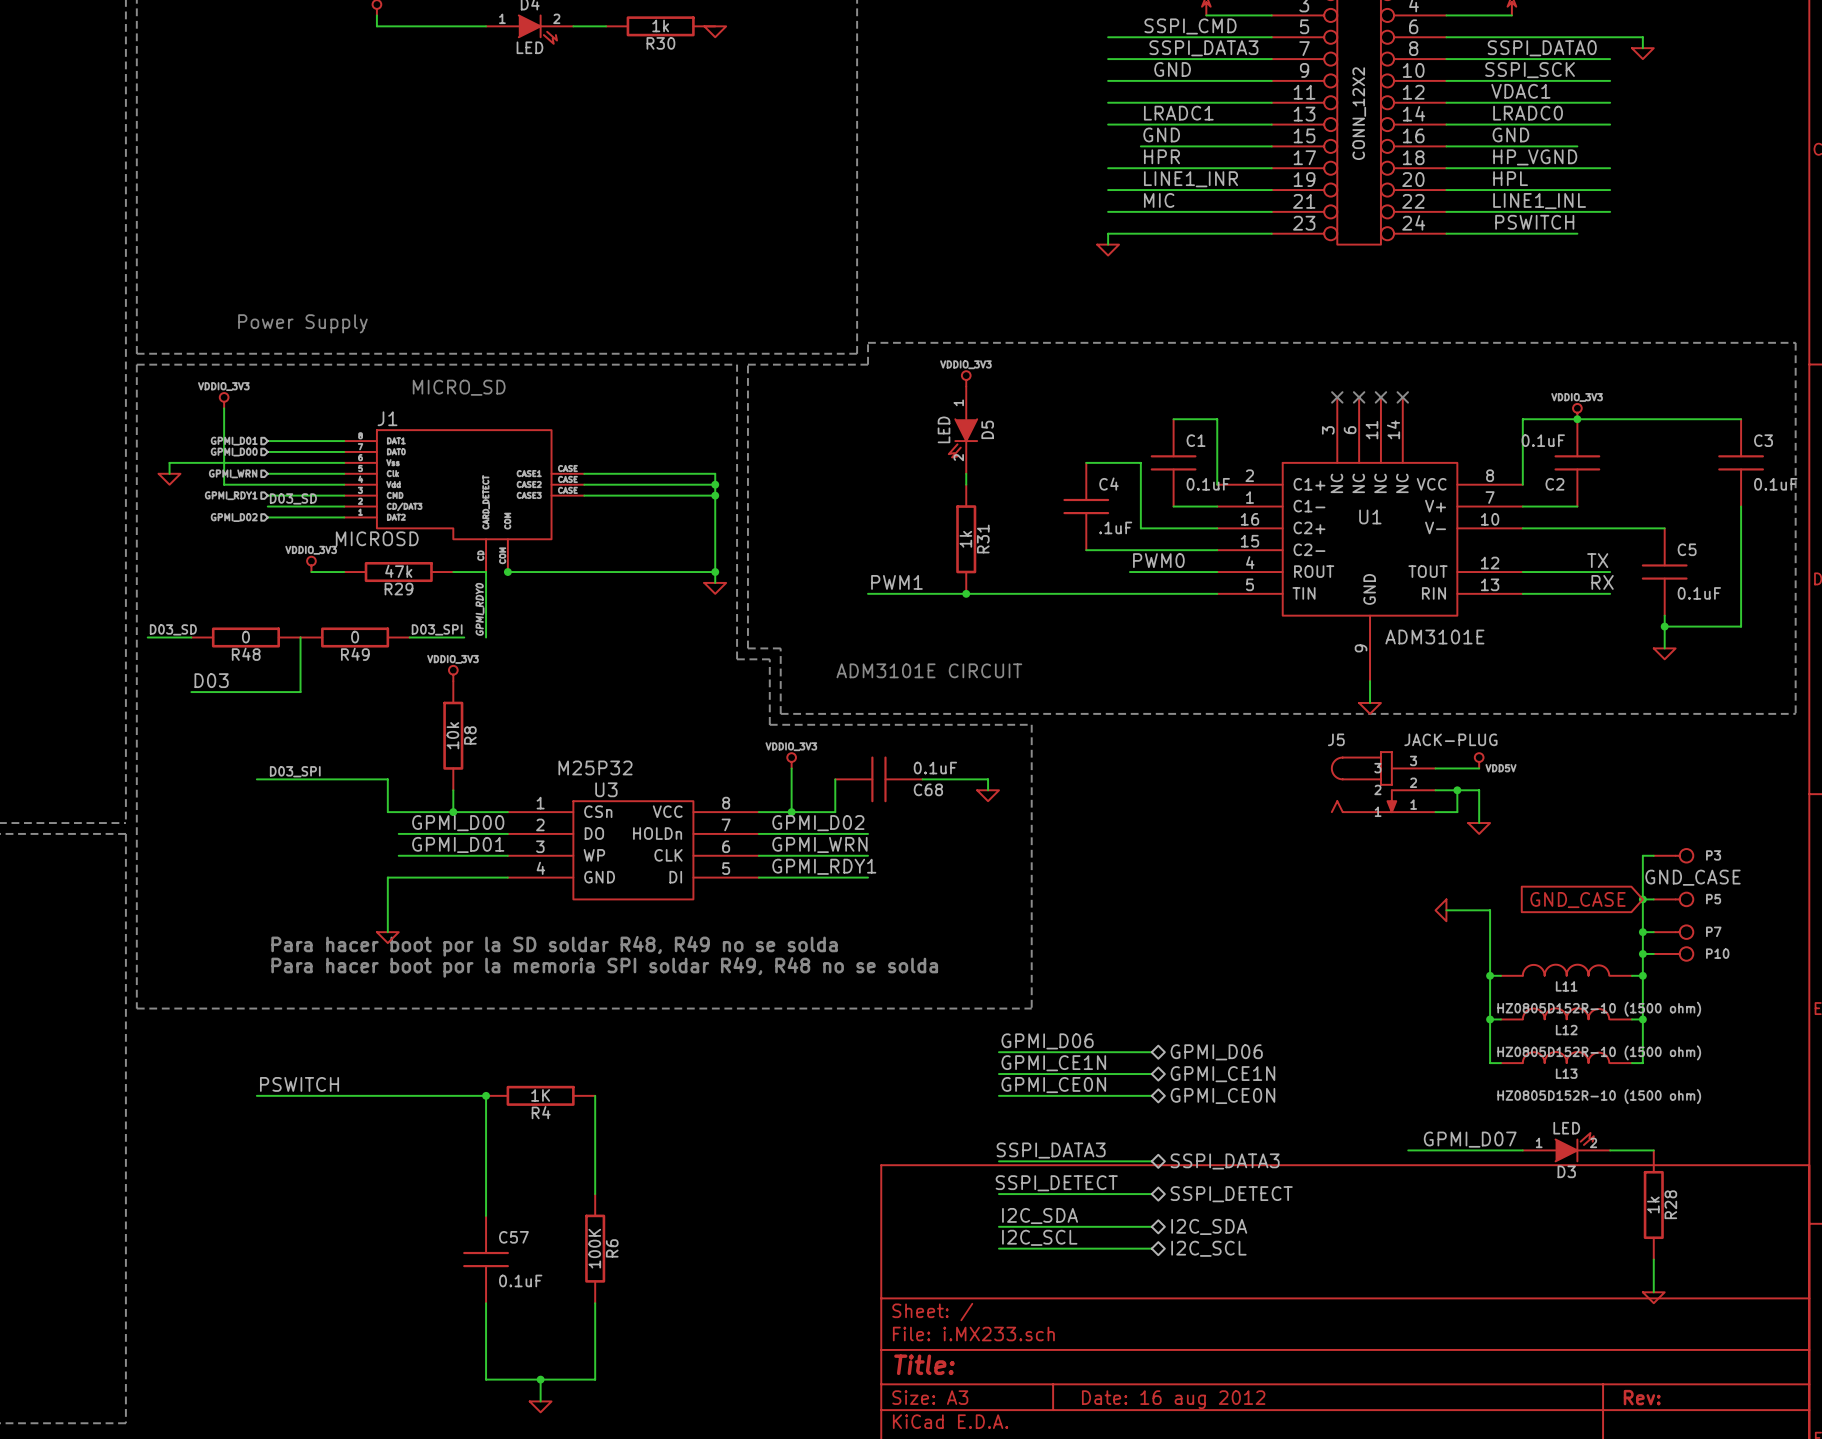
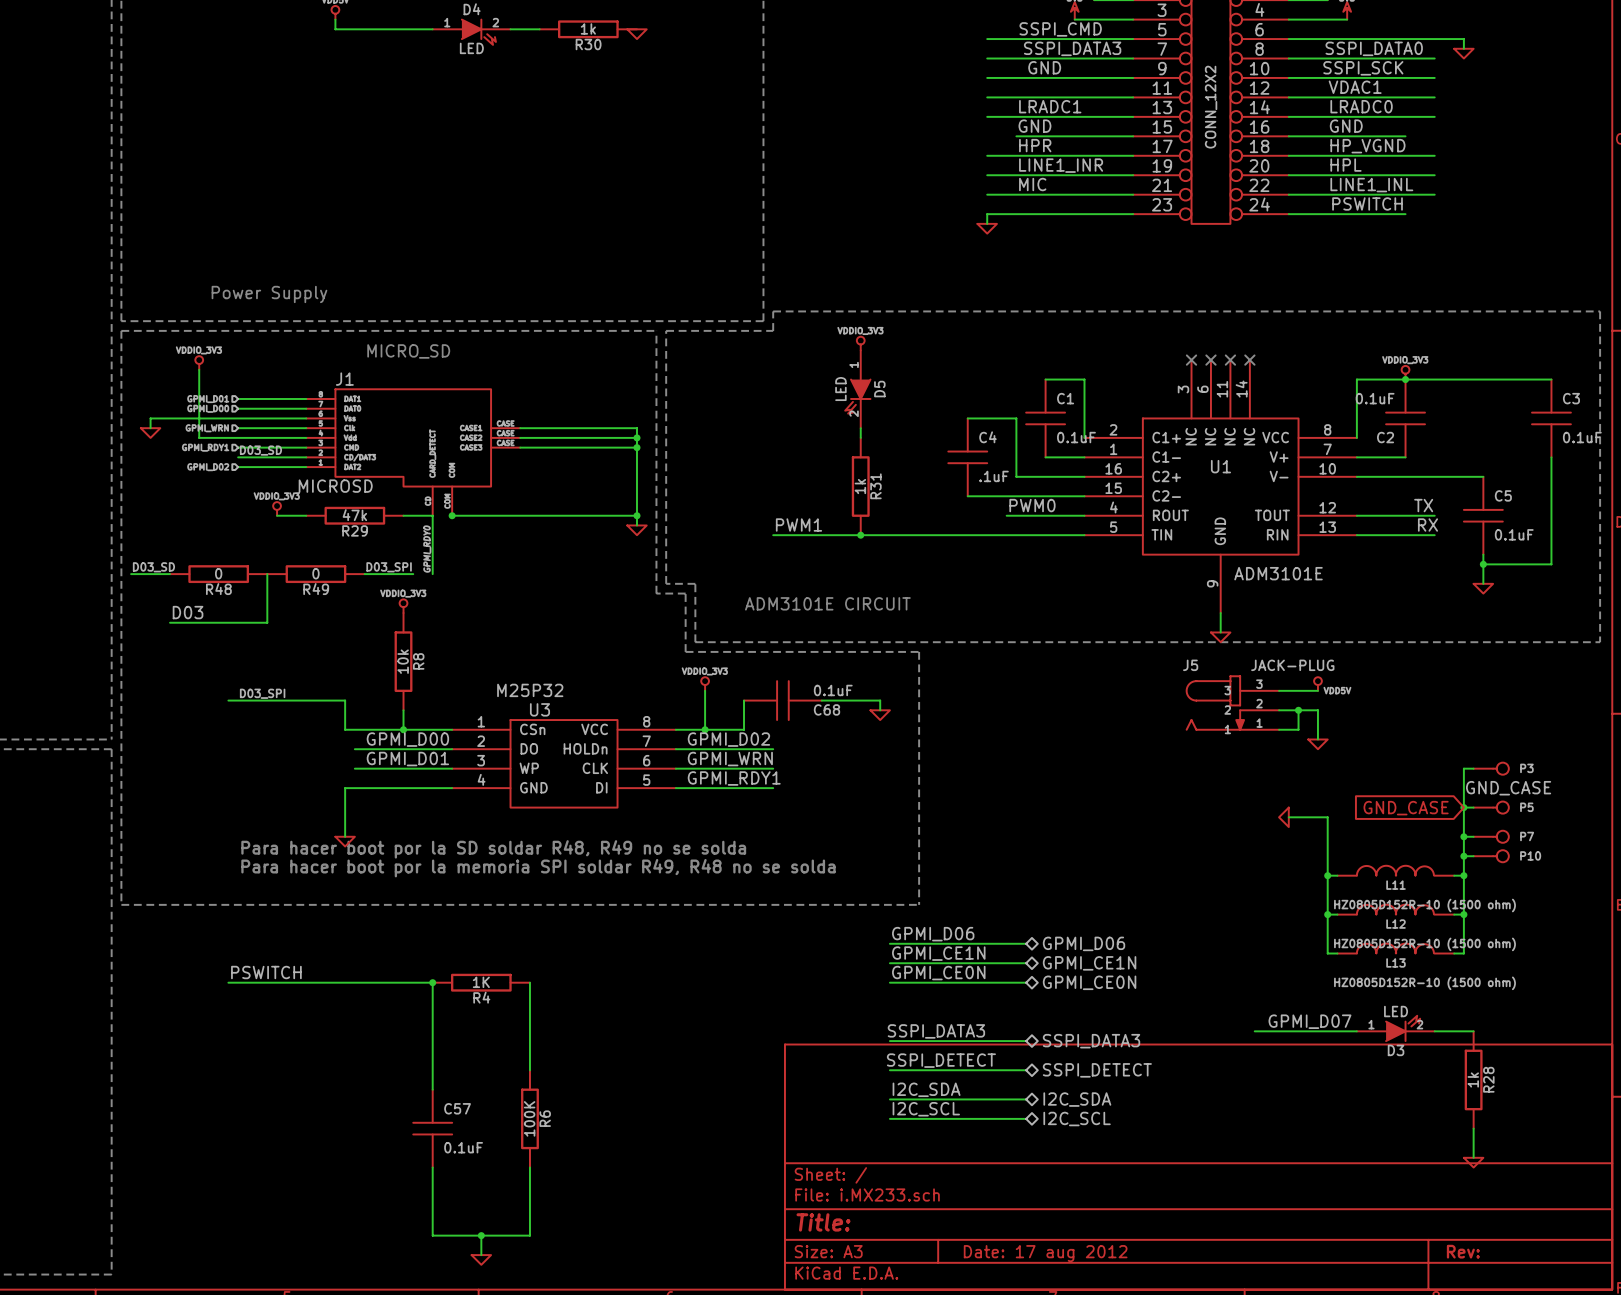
title block: Date: 16 aug 2012 (1173, 1399) -> Date: 17 aug 2012 (1045, 1253)

